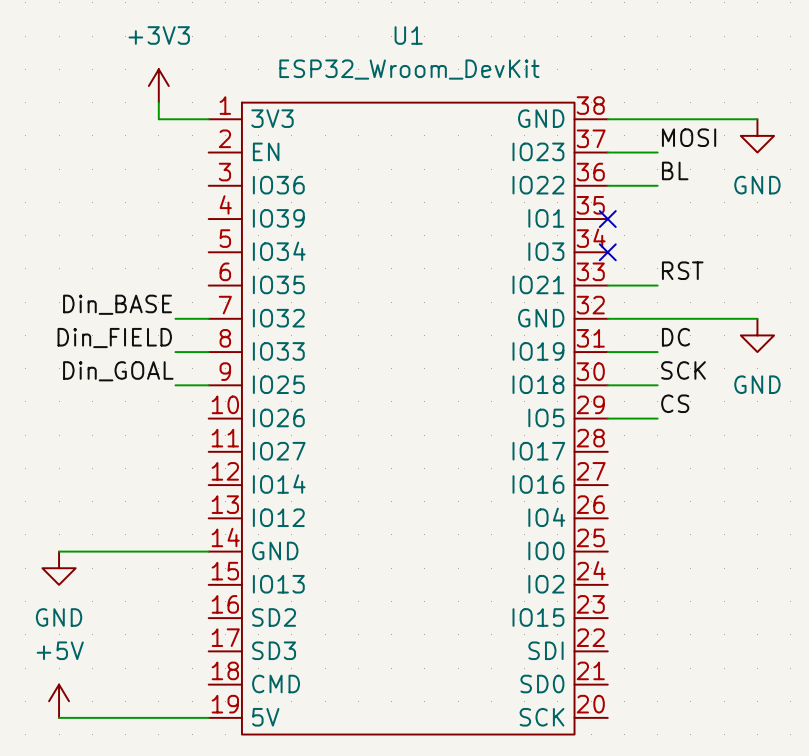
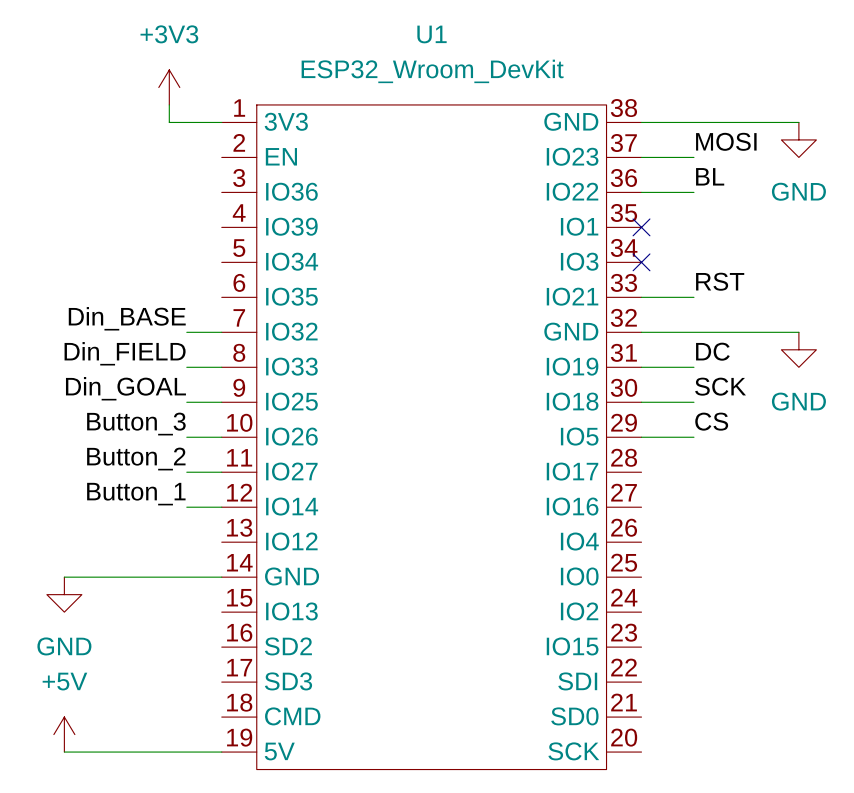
label: none -> Button_3 (136, 424)
wire: none -> (186, 437) (221, 437)
label: none -> Button_2 (136, 459)
wire: none -> (186, 472) (221, 472)
label: none -> Button_1 (136, 494)
wire: none -> (186, 507) (221, 507)

